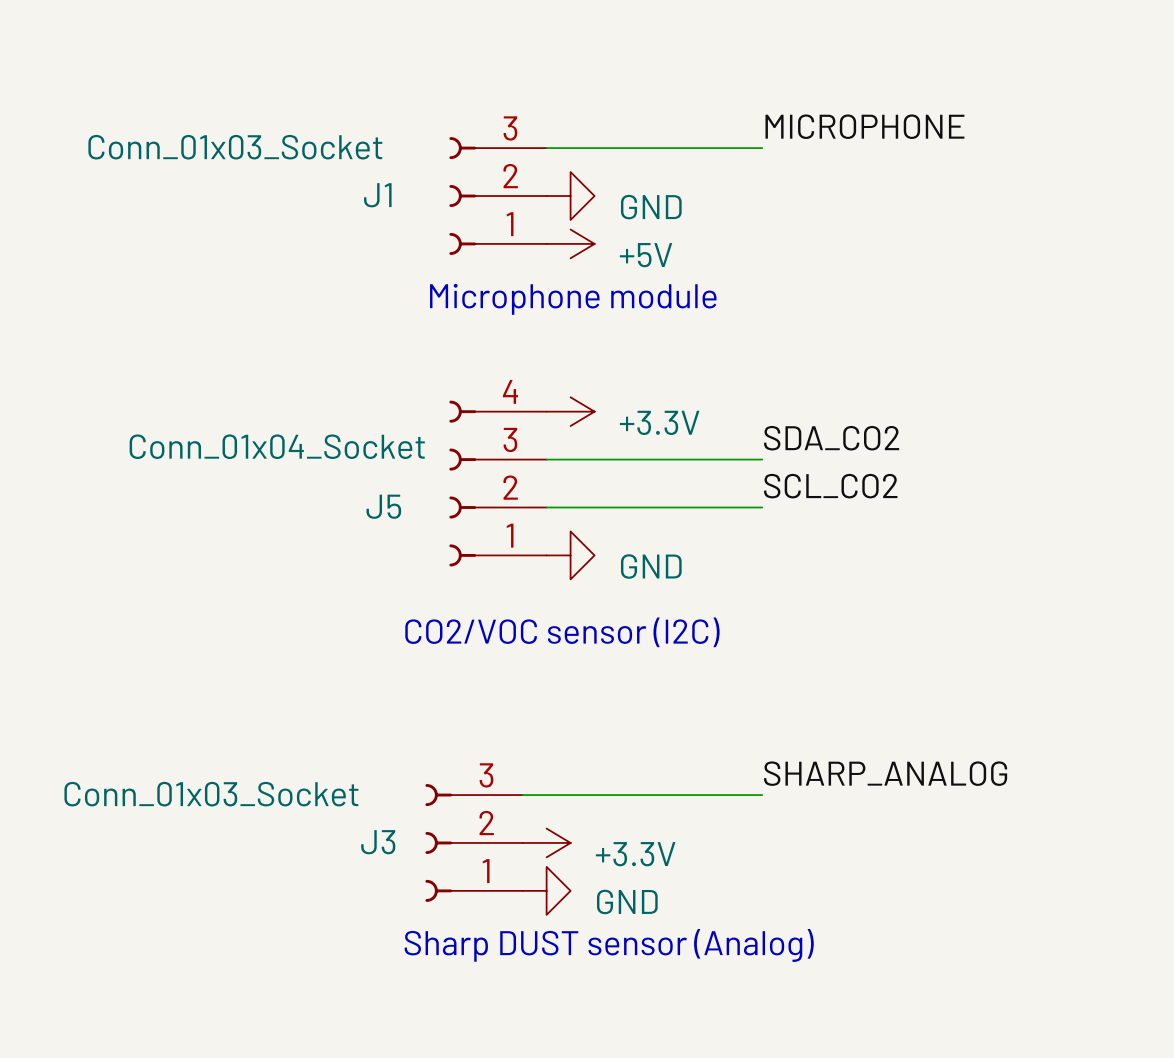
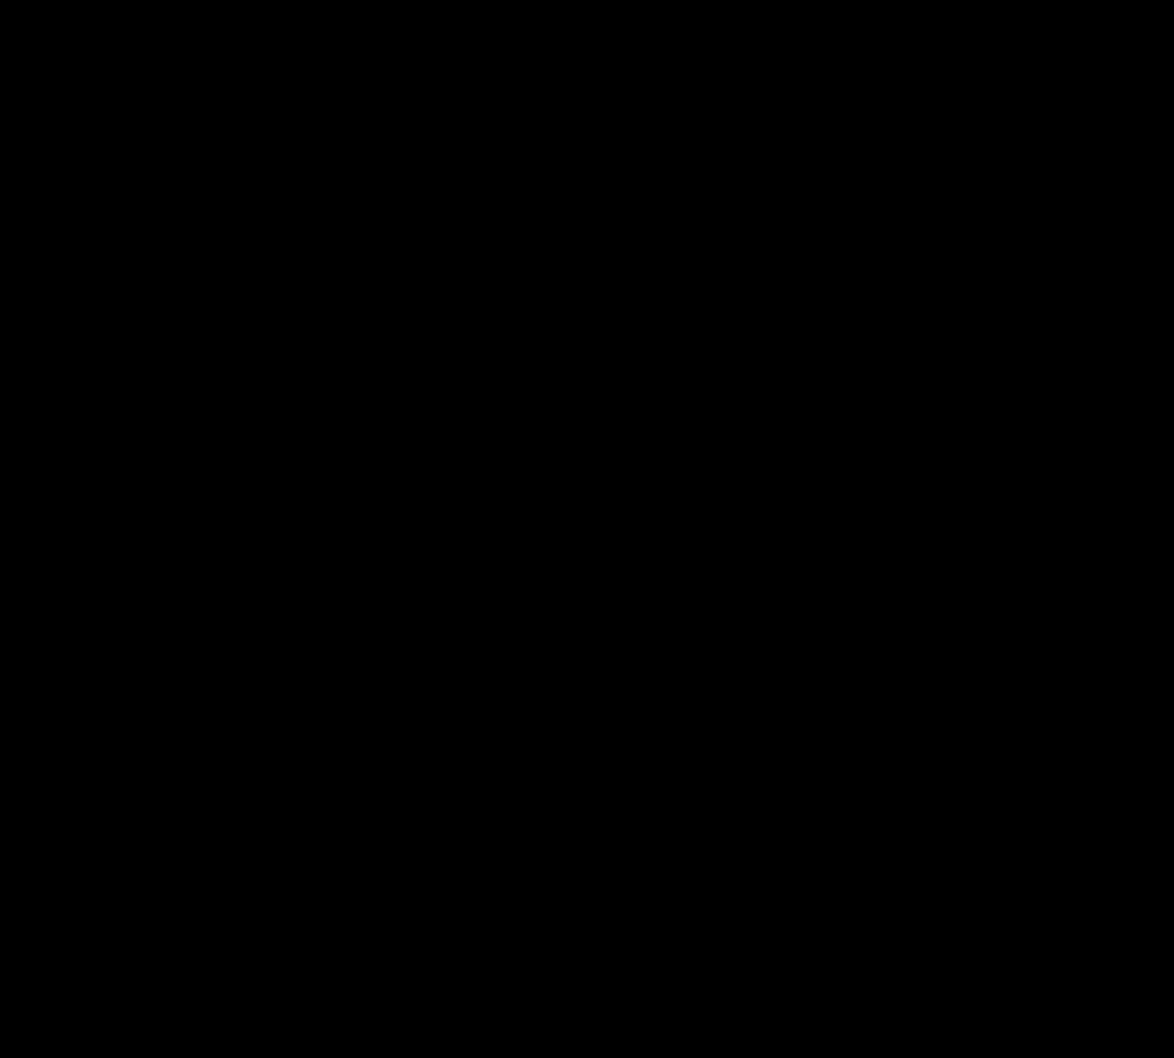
label: MICROPHONE (864, 126) -> none
wire: (546, 148) (762, 148) -> none
J1: Conn_01x03_Socket (497, 196) -> none
power symbol: GND (570, 196) -> none
power symbol: +5V (570, 243) -> none
text: Microphone module (573, 299) -> none
power symbol: +3.3V (570, 411) -> none
label: SDA_CO2 (831, 438) -> none
wire: (546, 459) (762, 459) -> none
J5: Conn_01x04_Socket (497, 483) -> none
label: SCL_CO2 (830, 486) -> none
wire: (546, 507) (762, 507) -> none
power symbol: GND (570, 555) -> none
text: CO2/VOC sensor (I2C) (562, 632) -> none
label: SHARP_ANALOG (885, 773) -> none
wire: (522, 795) (762, 795) -> none
J3: Conn_01x03_Socket (474, 842) -> none
power symbol: +3.3V (546, 842) -> none
power symbol: GND (546, 890) -> none
text: Sharp DUST sensor (Analog) (609, 945) -> none

